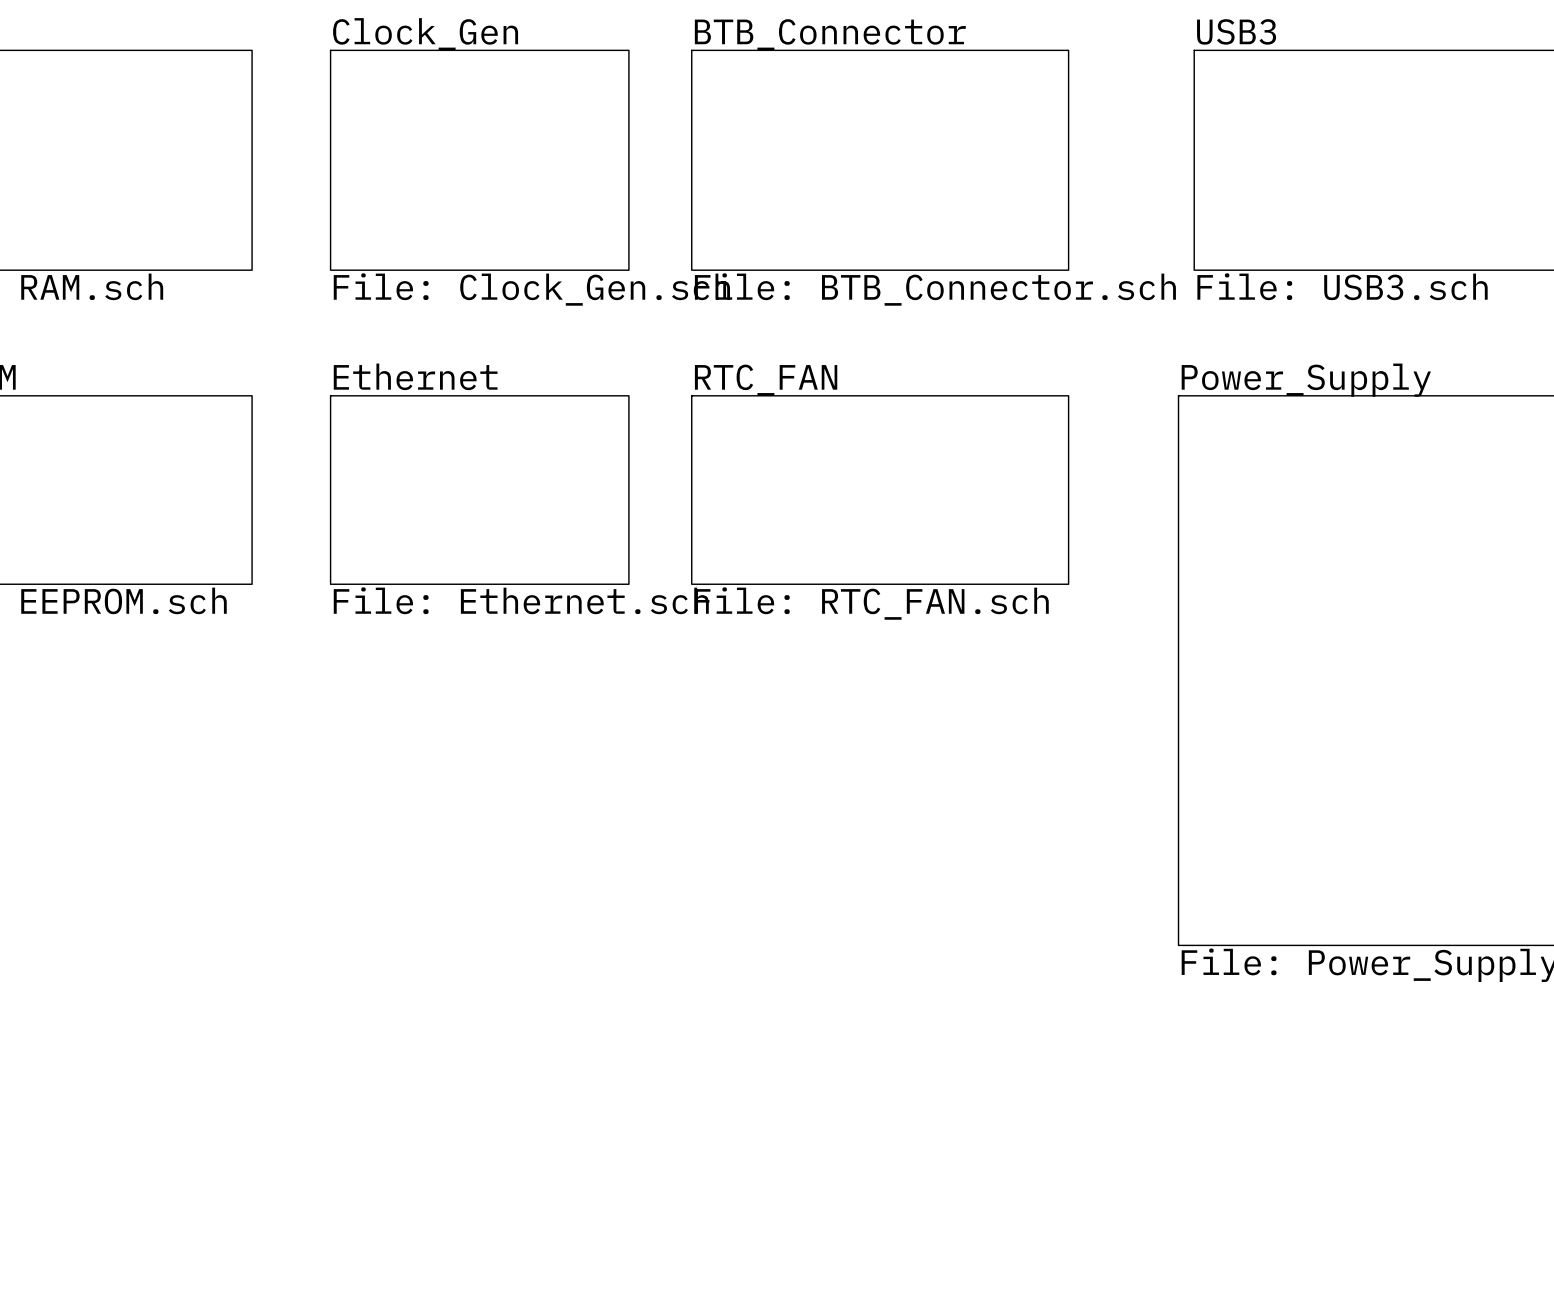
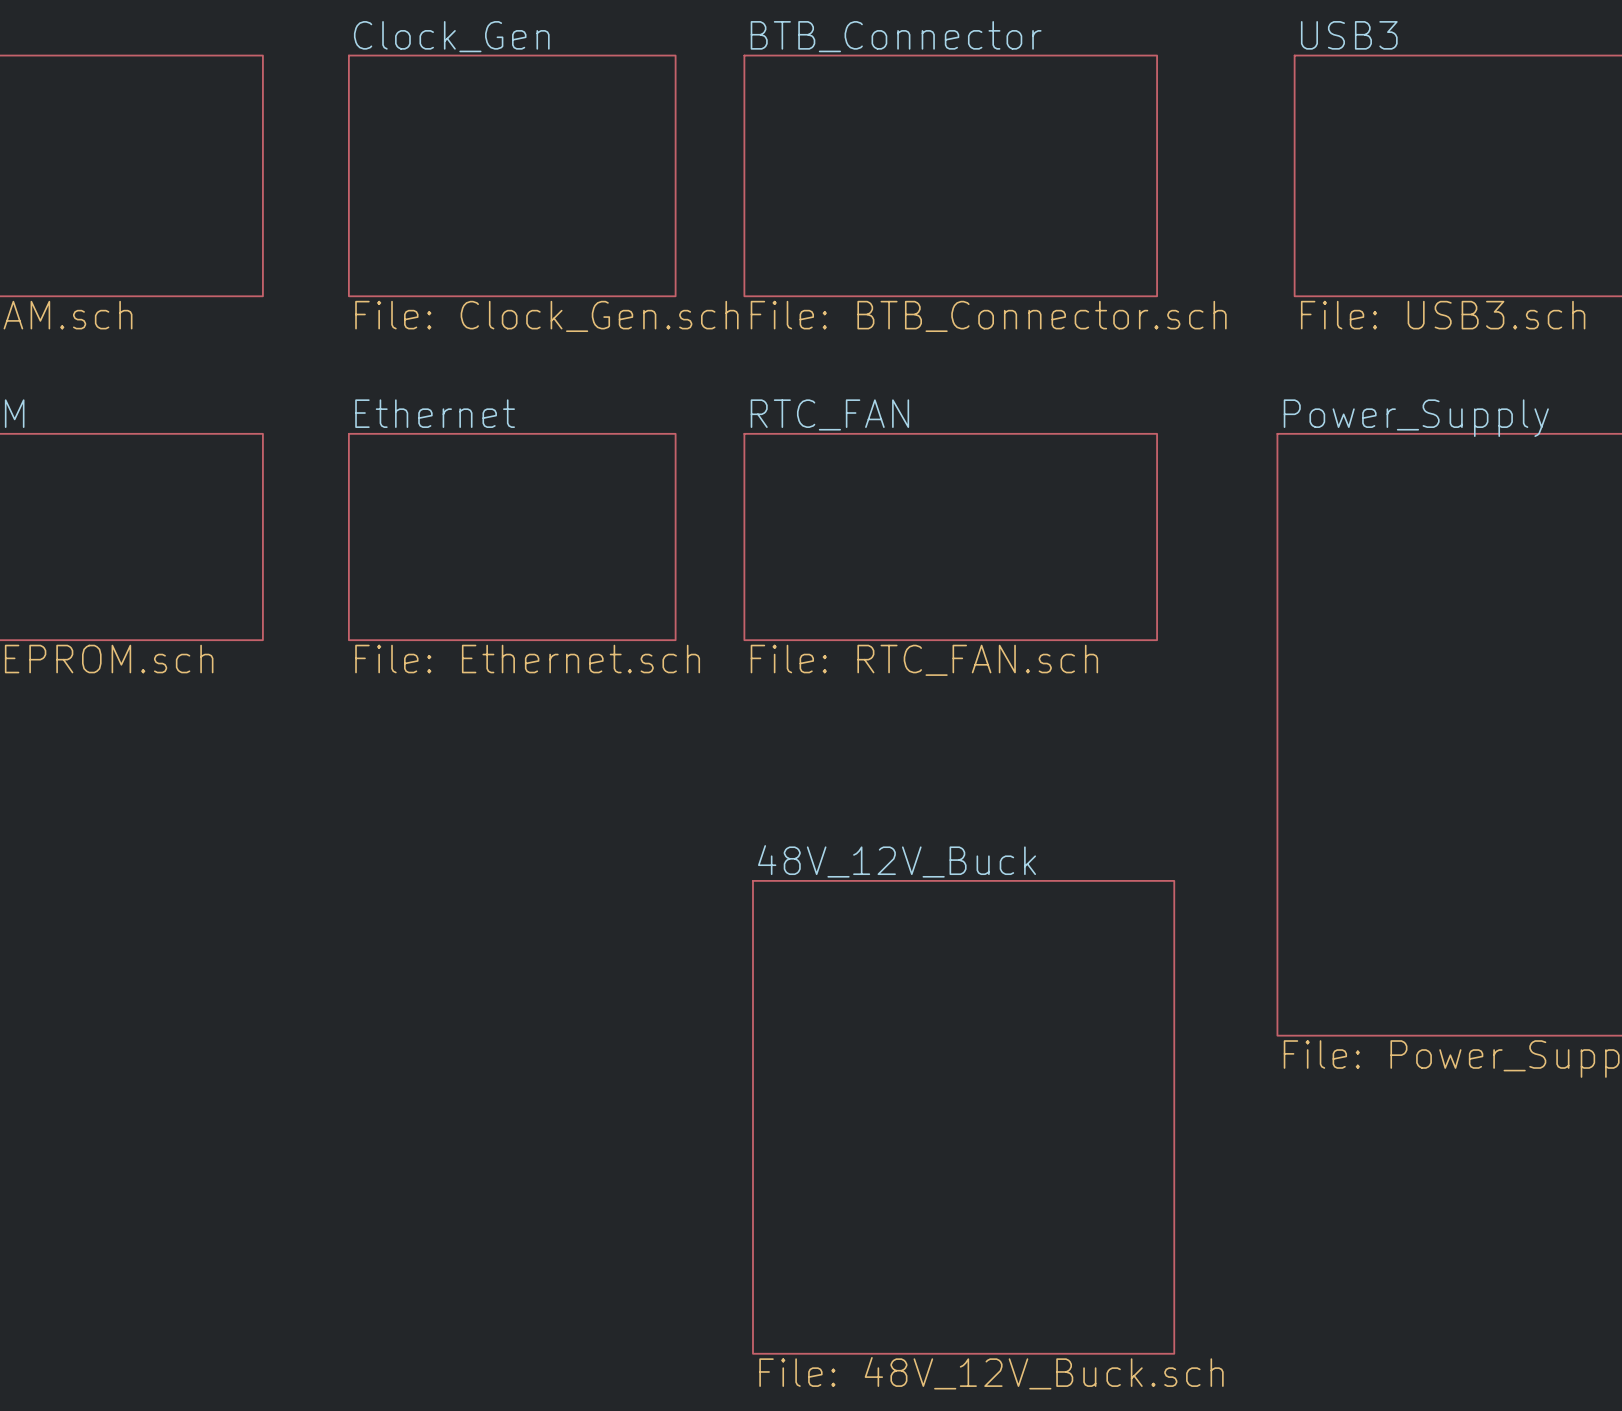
sheet 48V_12V_Buck: none -> File: 48V_12V_Buck.sch (963, 1117)

